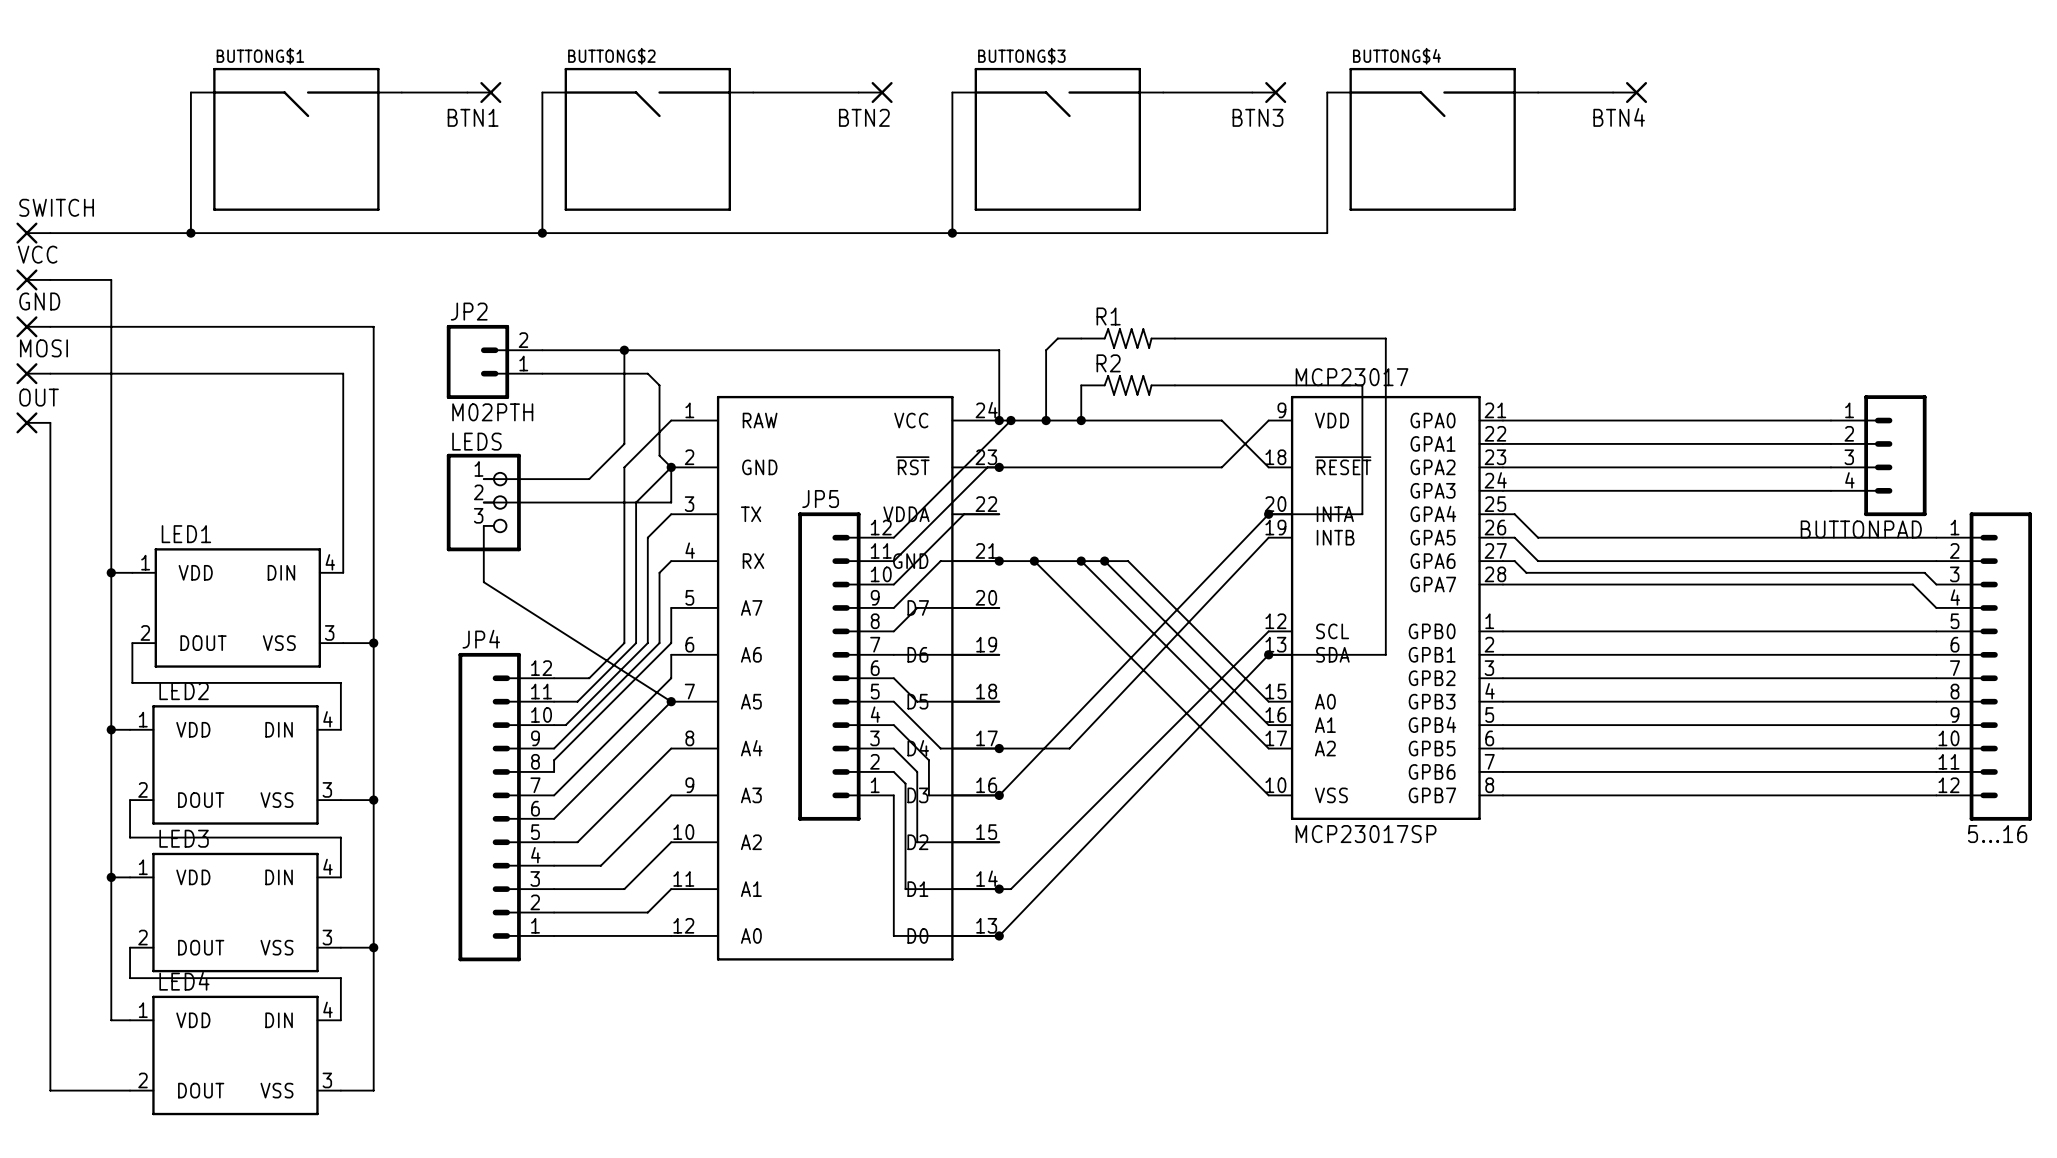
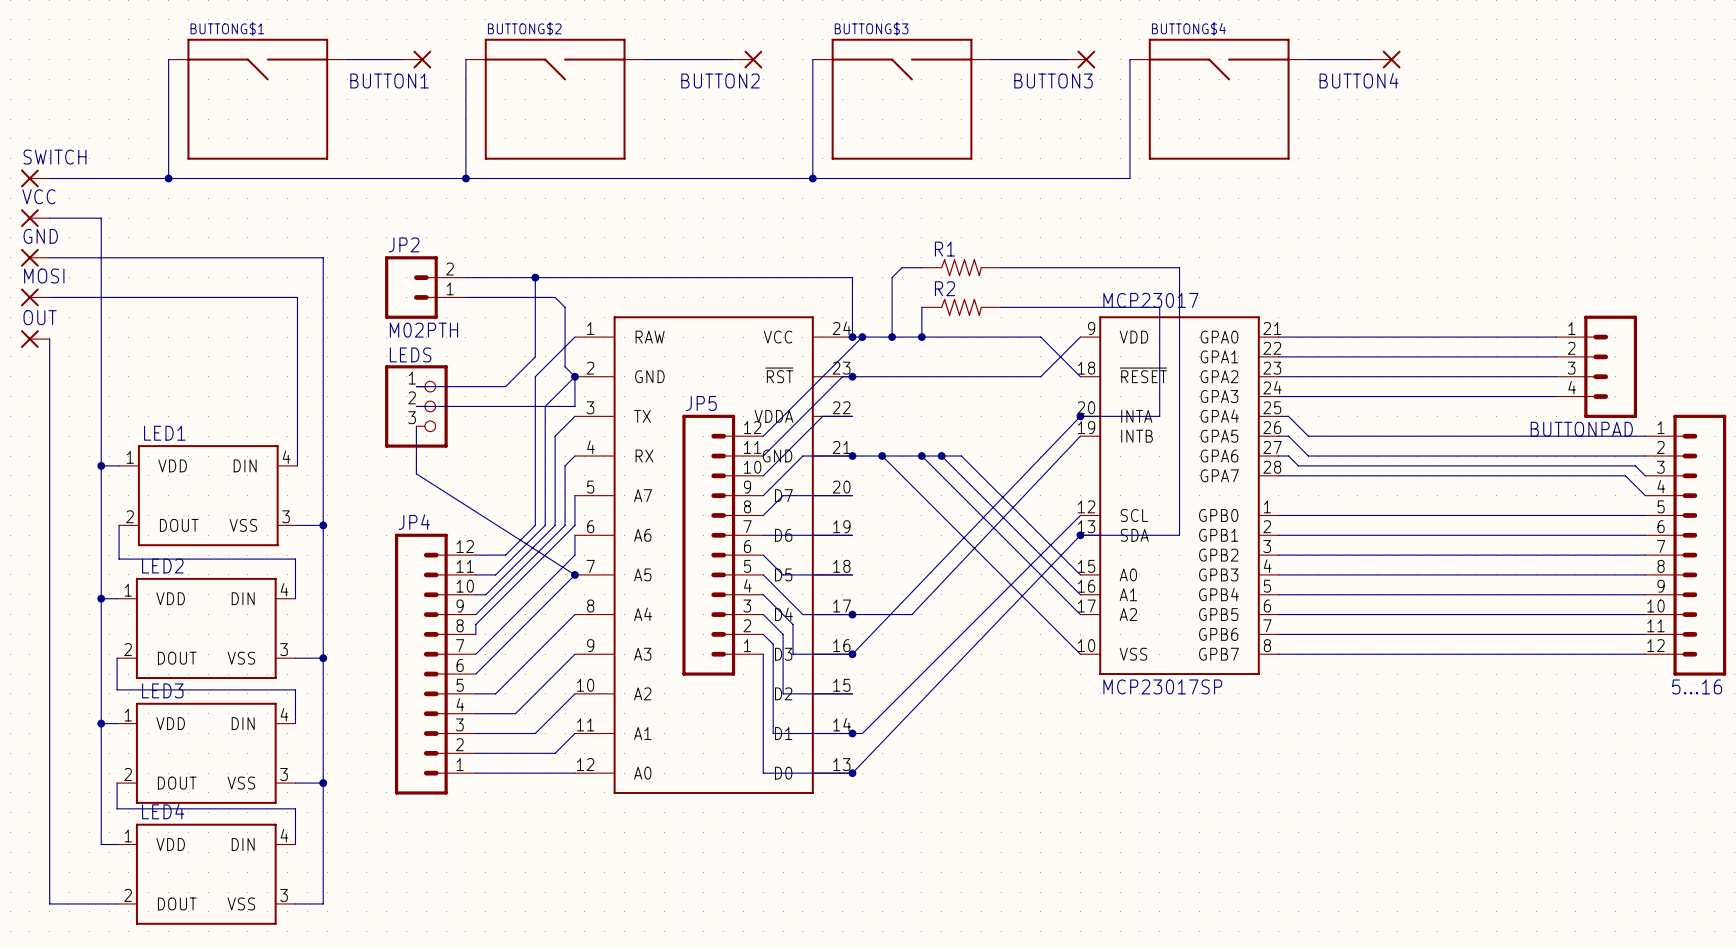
BTN1 name: BTN1 (473, 117) -> BUTTON1 (389, 80)
BTN2 name: BTN2 (864, 117) -> BUTTON2 (720, 80)
BTN3 name: BTN3 (1257, 117) -> BUTTON3 (1053, 80)
BTN4 name: BTN4 (1619, 117) -> BUTTON4 (1359, 80)

